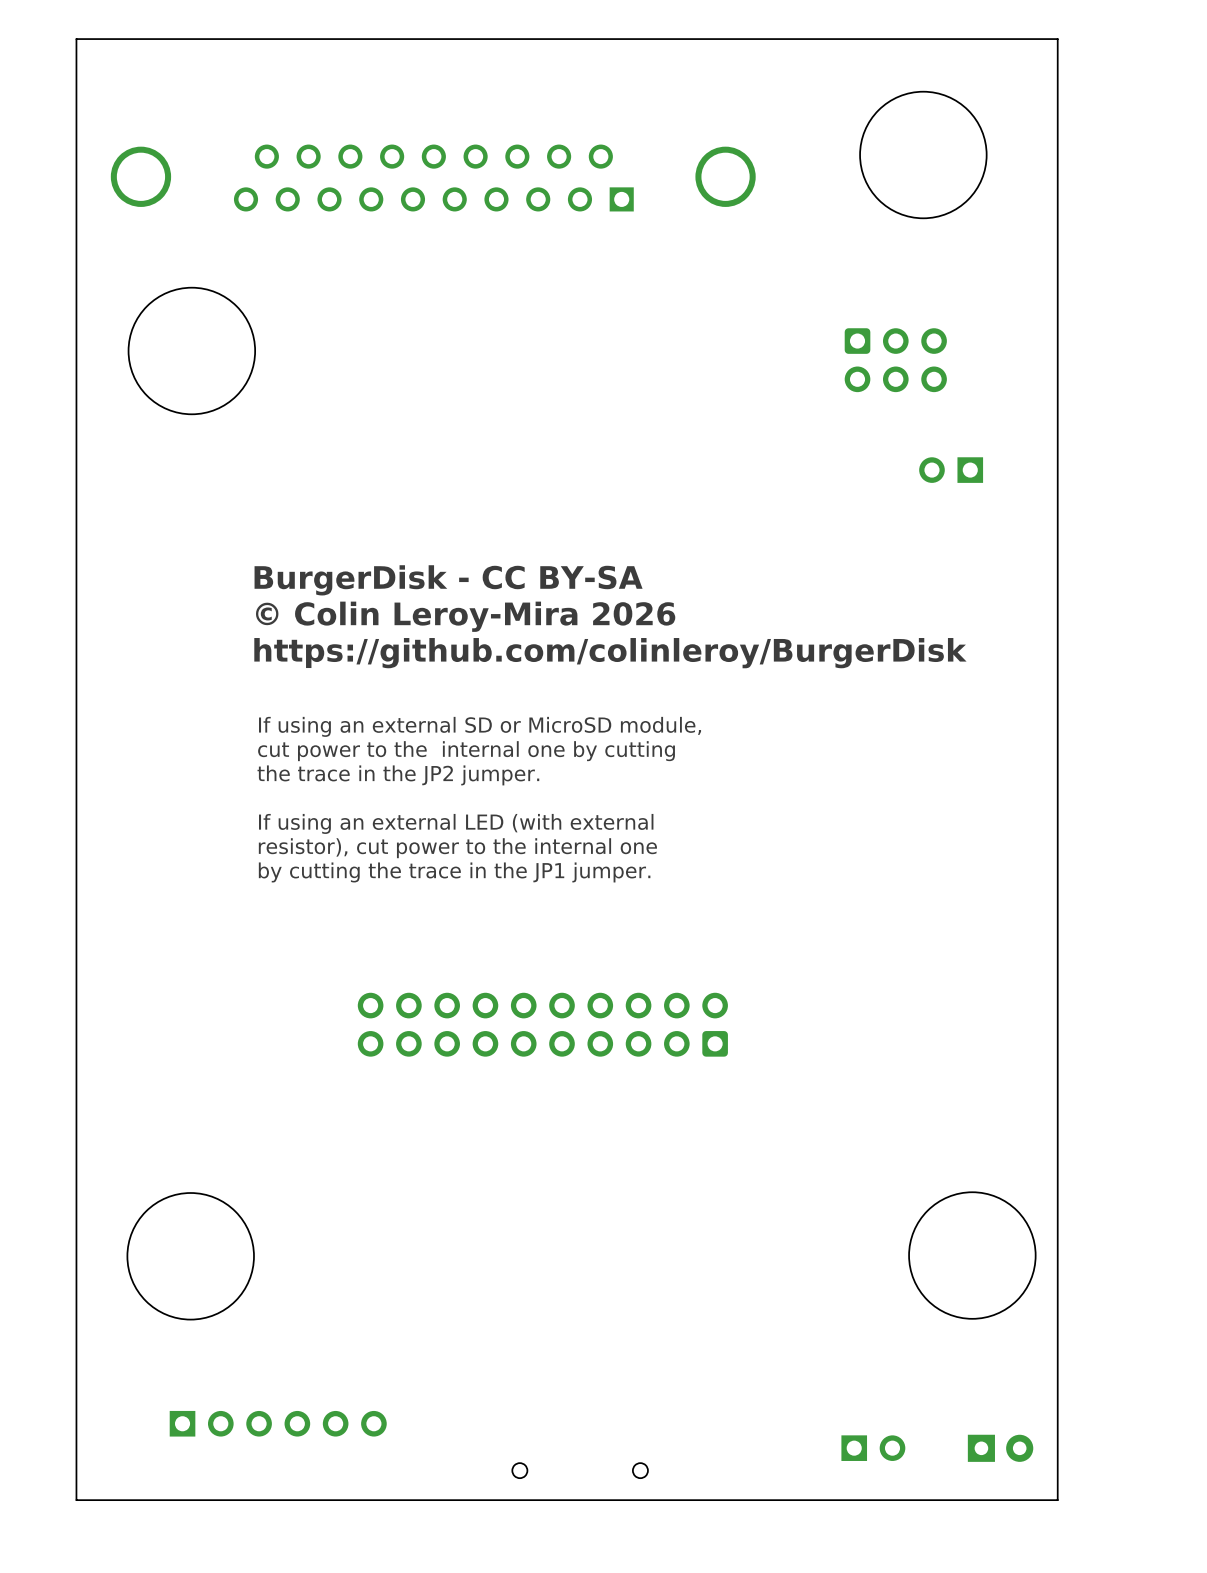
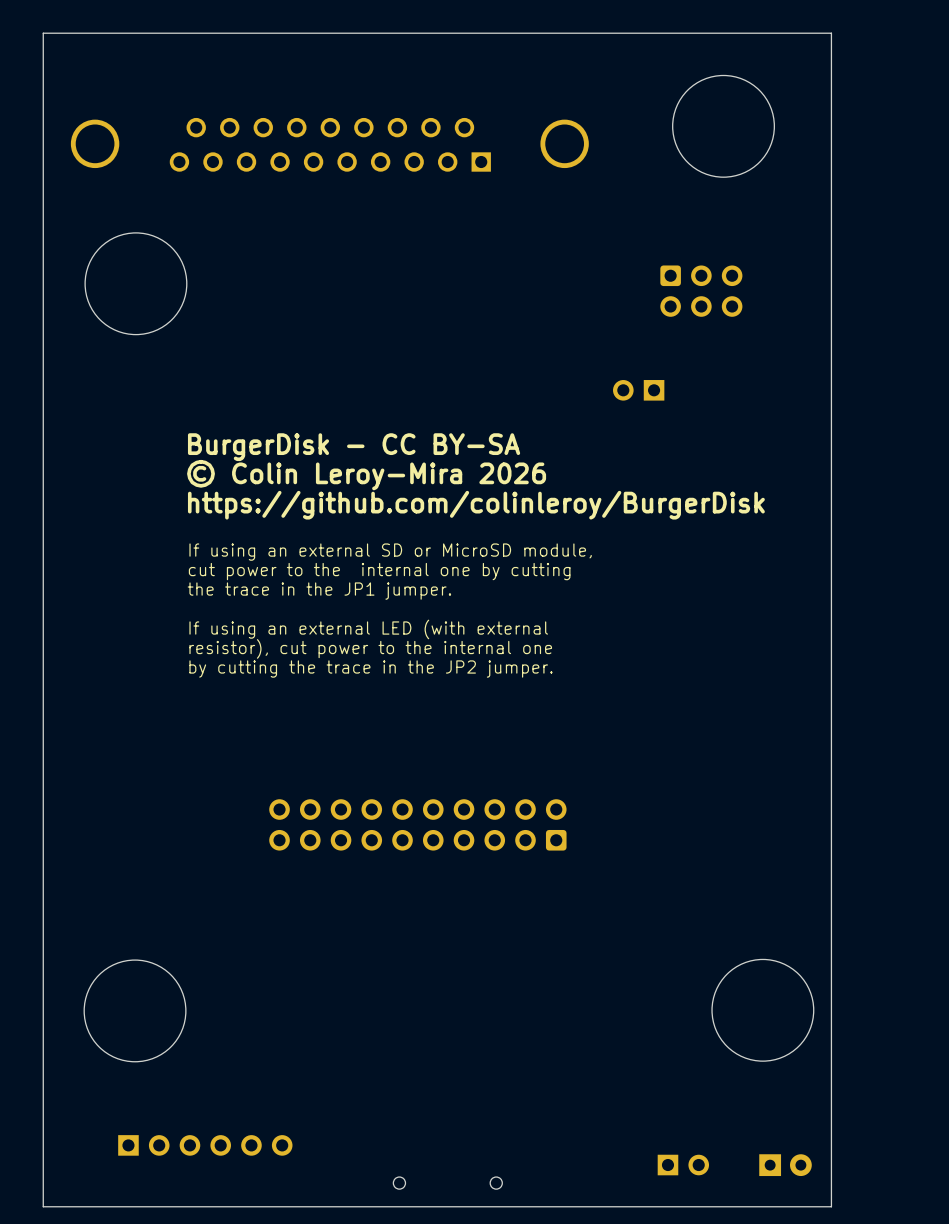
part position: (951, 470) -> (638, 390)
text: none -> BurgerDisk - CC BY-SA (354, 447)
text: BurgerDisk - CC BY-SA (448, 580) -> © Colin Leroy-Mira 2026 (366, 475)
text: © Colin Leroy-Mira 2026 (465, 616) -> https://github.com/colinleroy/BurgerDisk (476, 505)
text: https://github.com/colinleroy/BurgerDisk (610, 653) -> none
text: none -> If using an external SD or MicroSD module, (390, 552)
text: If using an external SD or MicroSD module, (480, 726) -> the trace in the JP1 jumper. (319, 591)
text position: cut power to the internal one by cutting (466, 751) -> cut power to the internal one by cutting (379, 571)
text: the trace in the JP2 jumper. (398, 775) -> If using an external LED (with external (368, 629)
text: If using an external LED (with external (456, 823) -> by cutting the trace in the JP2 jumper. (371, 669)
text position: resistor), cut power to the internal one (457, 848) -> resistor), cut power to the internal one (370, 648)
text: by cutting the trace in the JP1 jumper. (454, 872) -> none

